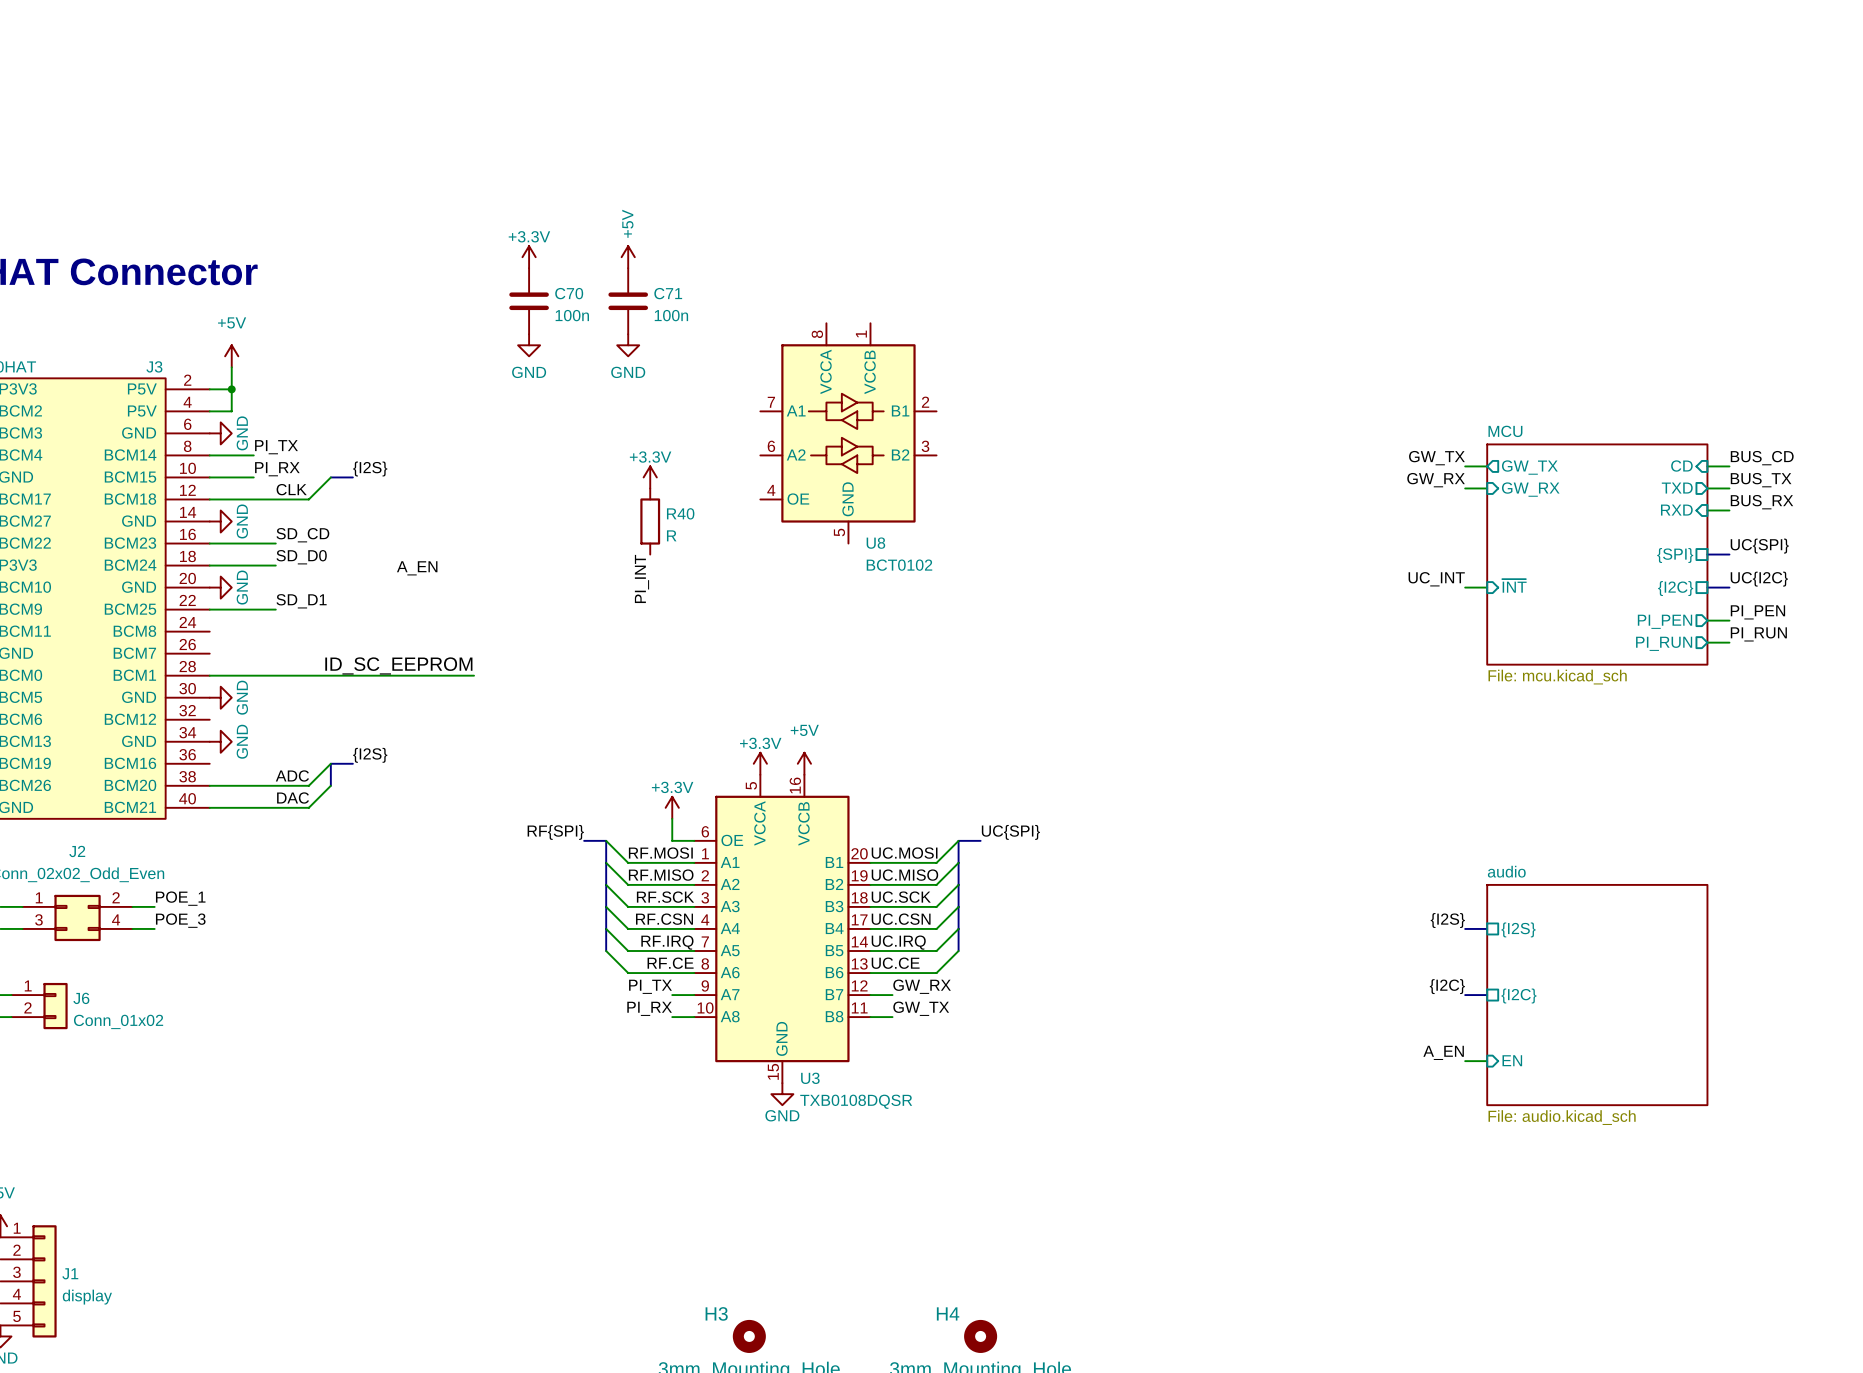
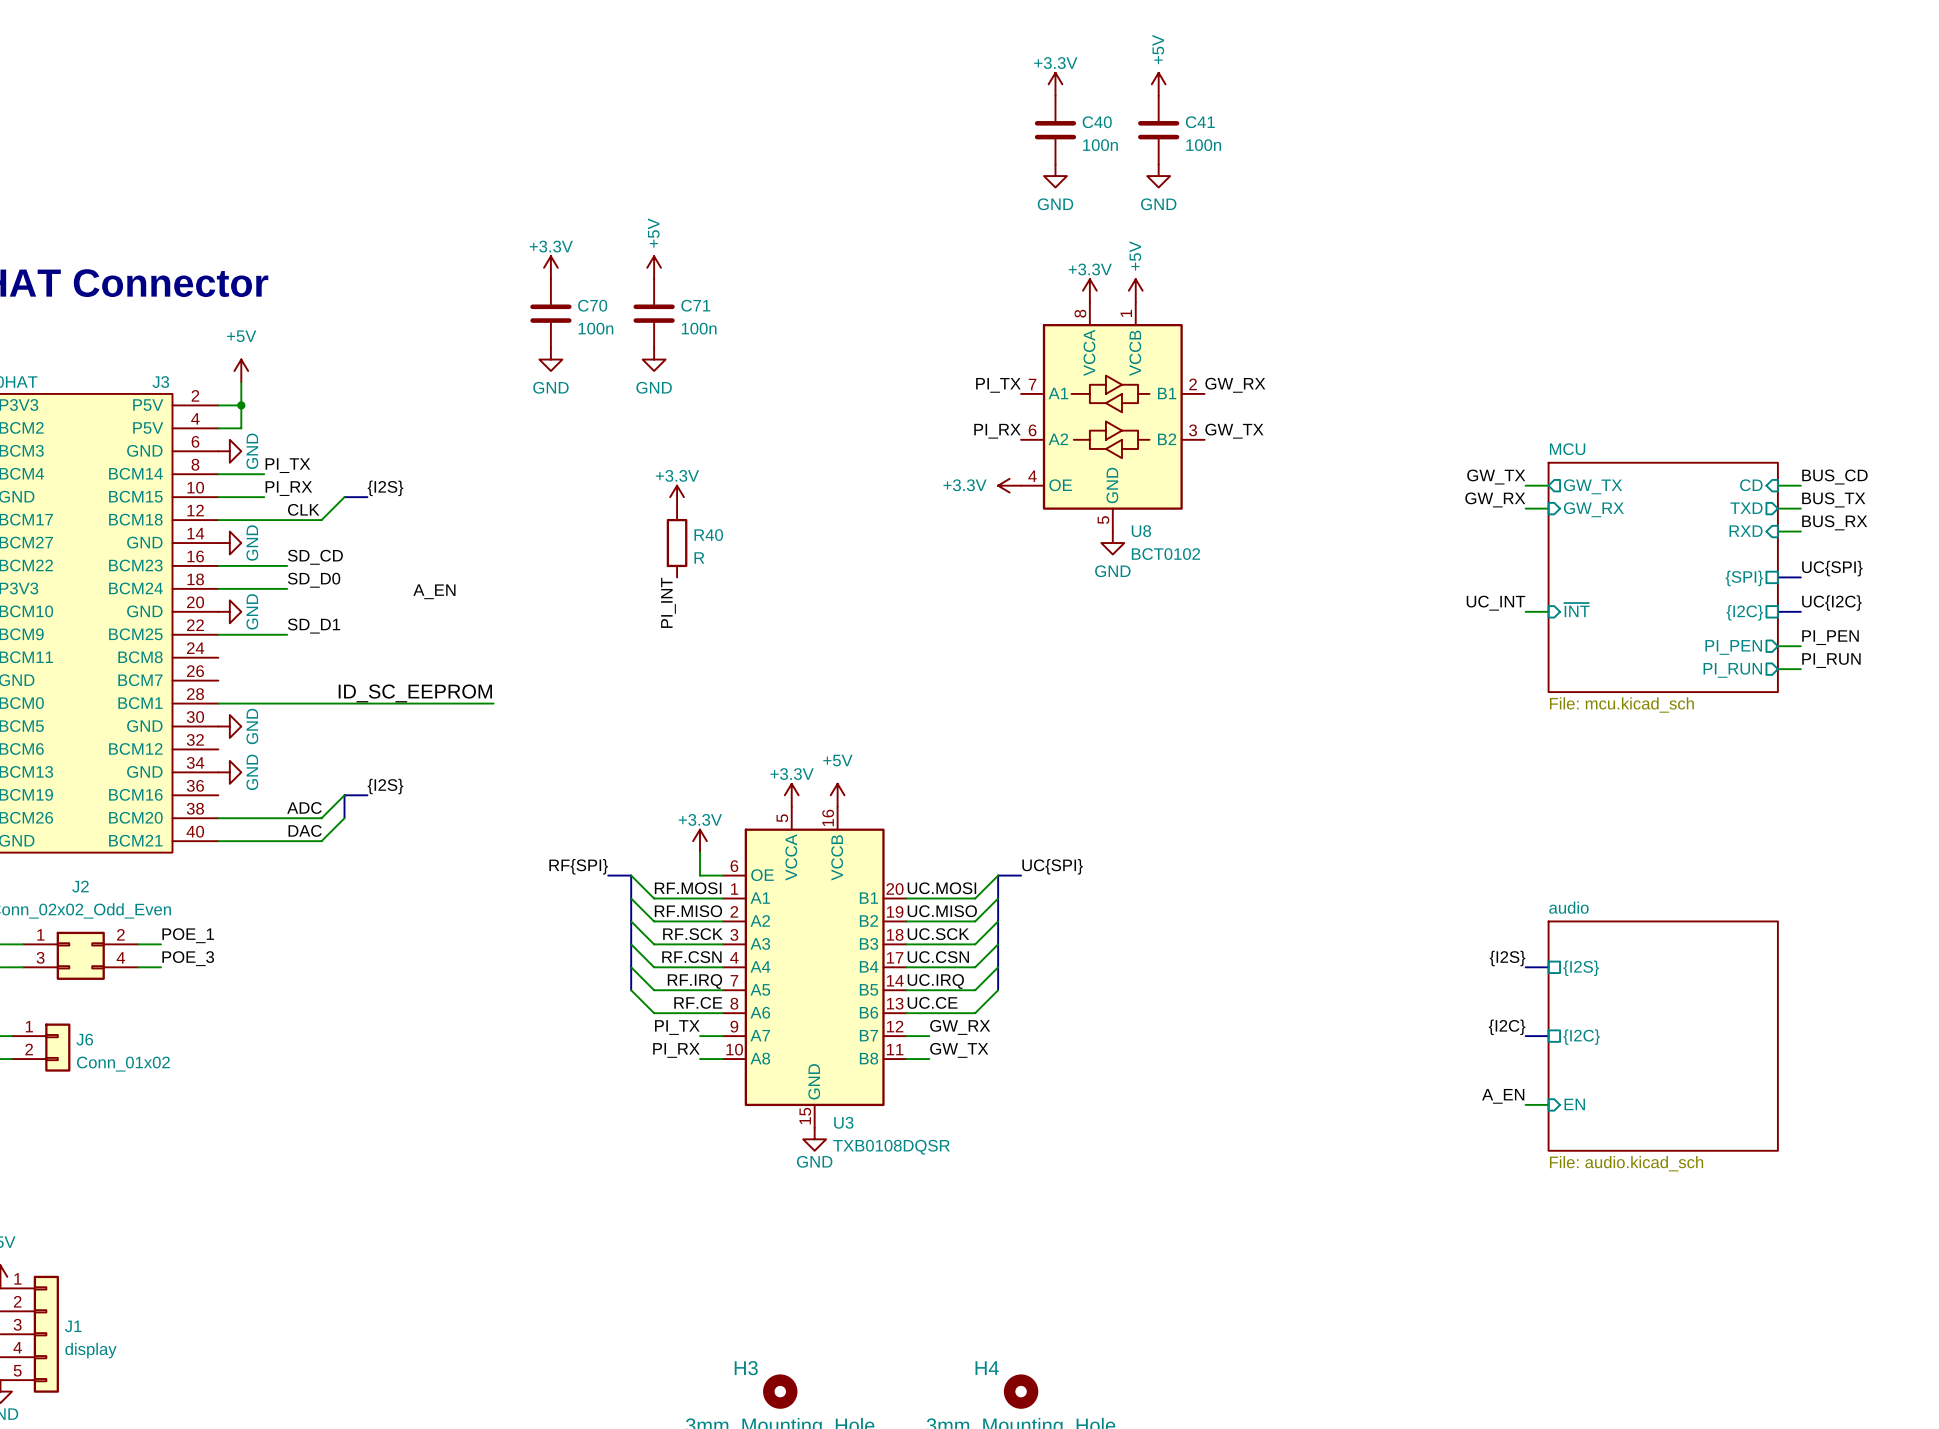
power symbol: none -> +3.3V (1055, 84)
power symbol: none -> +5V (1158, 84)
C40: none -> 100n (1055, 130)
C41: none -> 100n (1158, 130)
power symbol: none -> GND (1055, 176)
power symbol: none -> GND (1158, 176)
power symbol: none -> +3.3V (1089, 290)
power symbol: none -> +5V (1135, 290)
label: none -> PI_TX (998, 385)
label: none -> GW_RX (1235, 385)
label: none -> PI_RX (997, 431)
label: none -> GW_TX (1234, 431)
U8 position: (848, 433) -> (1112, 416)
power symbol: none -> +3.3V (1009, 485)
power symbol: none -> GND (1112, 543)

